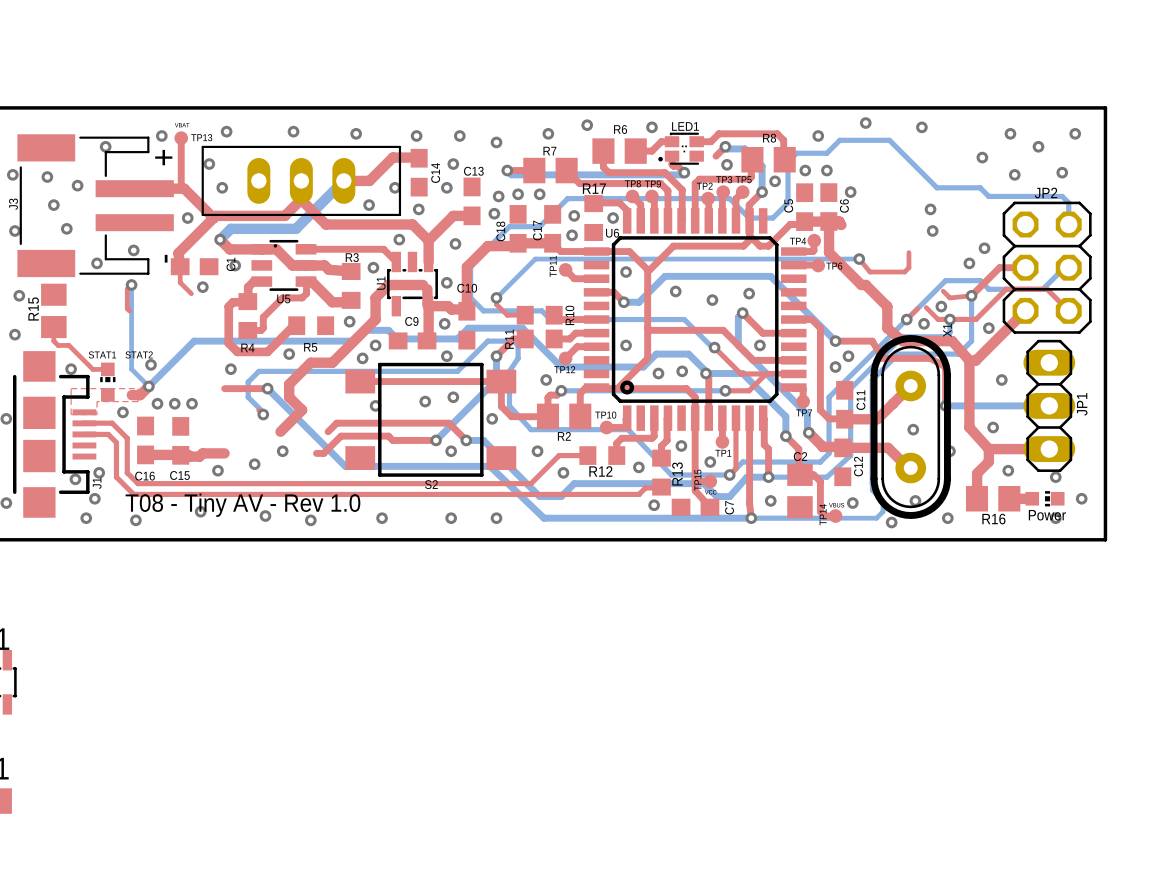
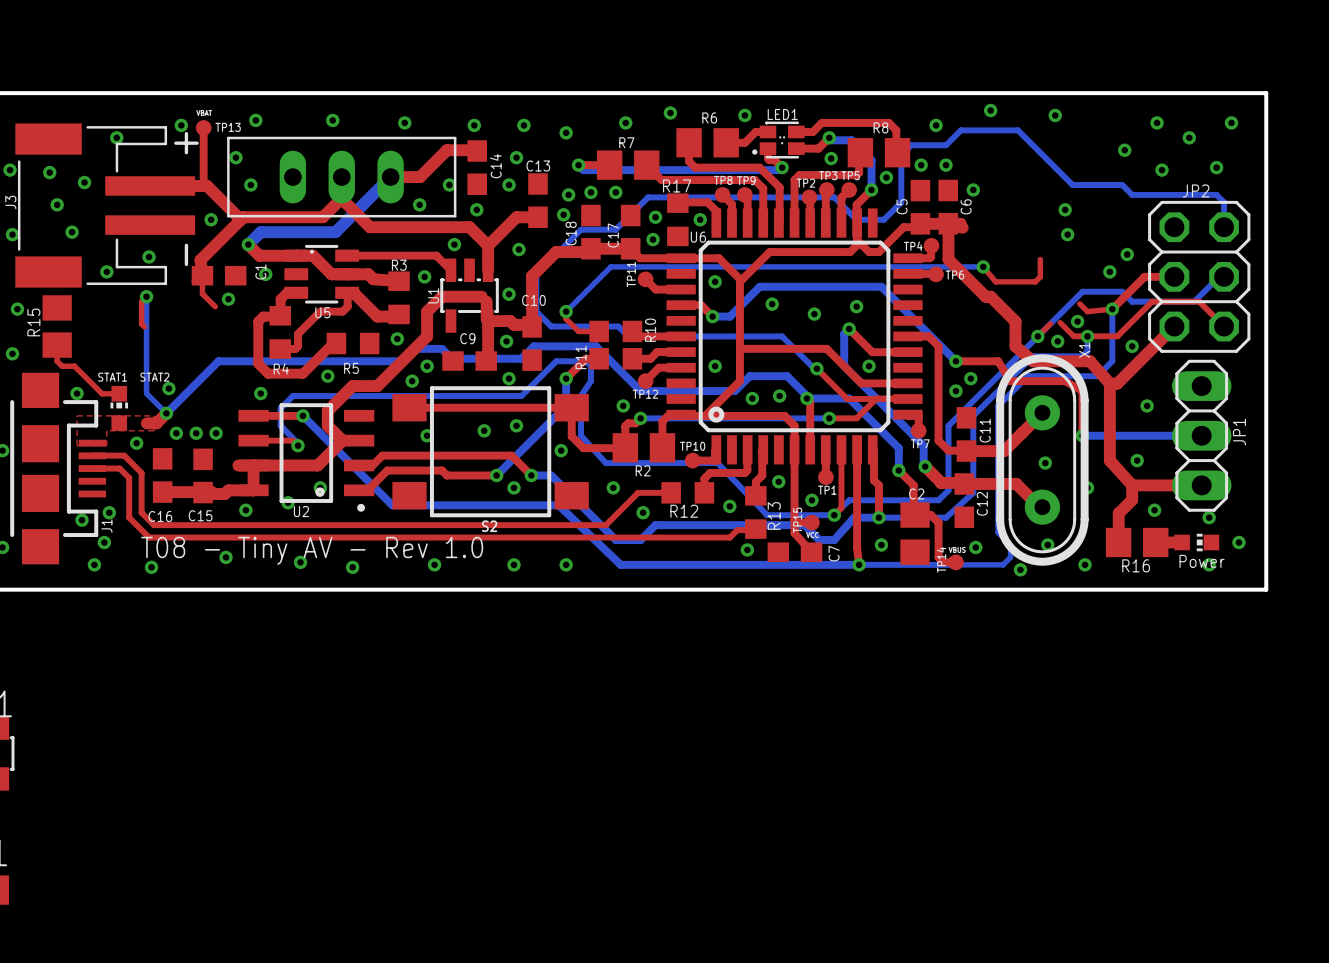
top track: none -> (796, 148) (818, 148)
top track: none -> (253, 440) (292, 440)
U2: none -> (306, 457)
top track: none -> (253, 465) (253, 490)

